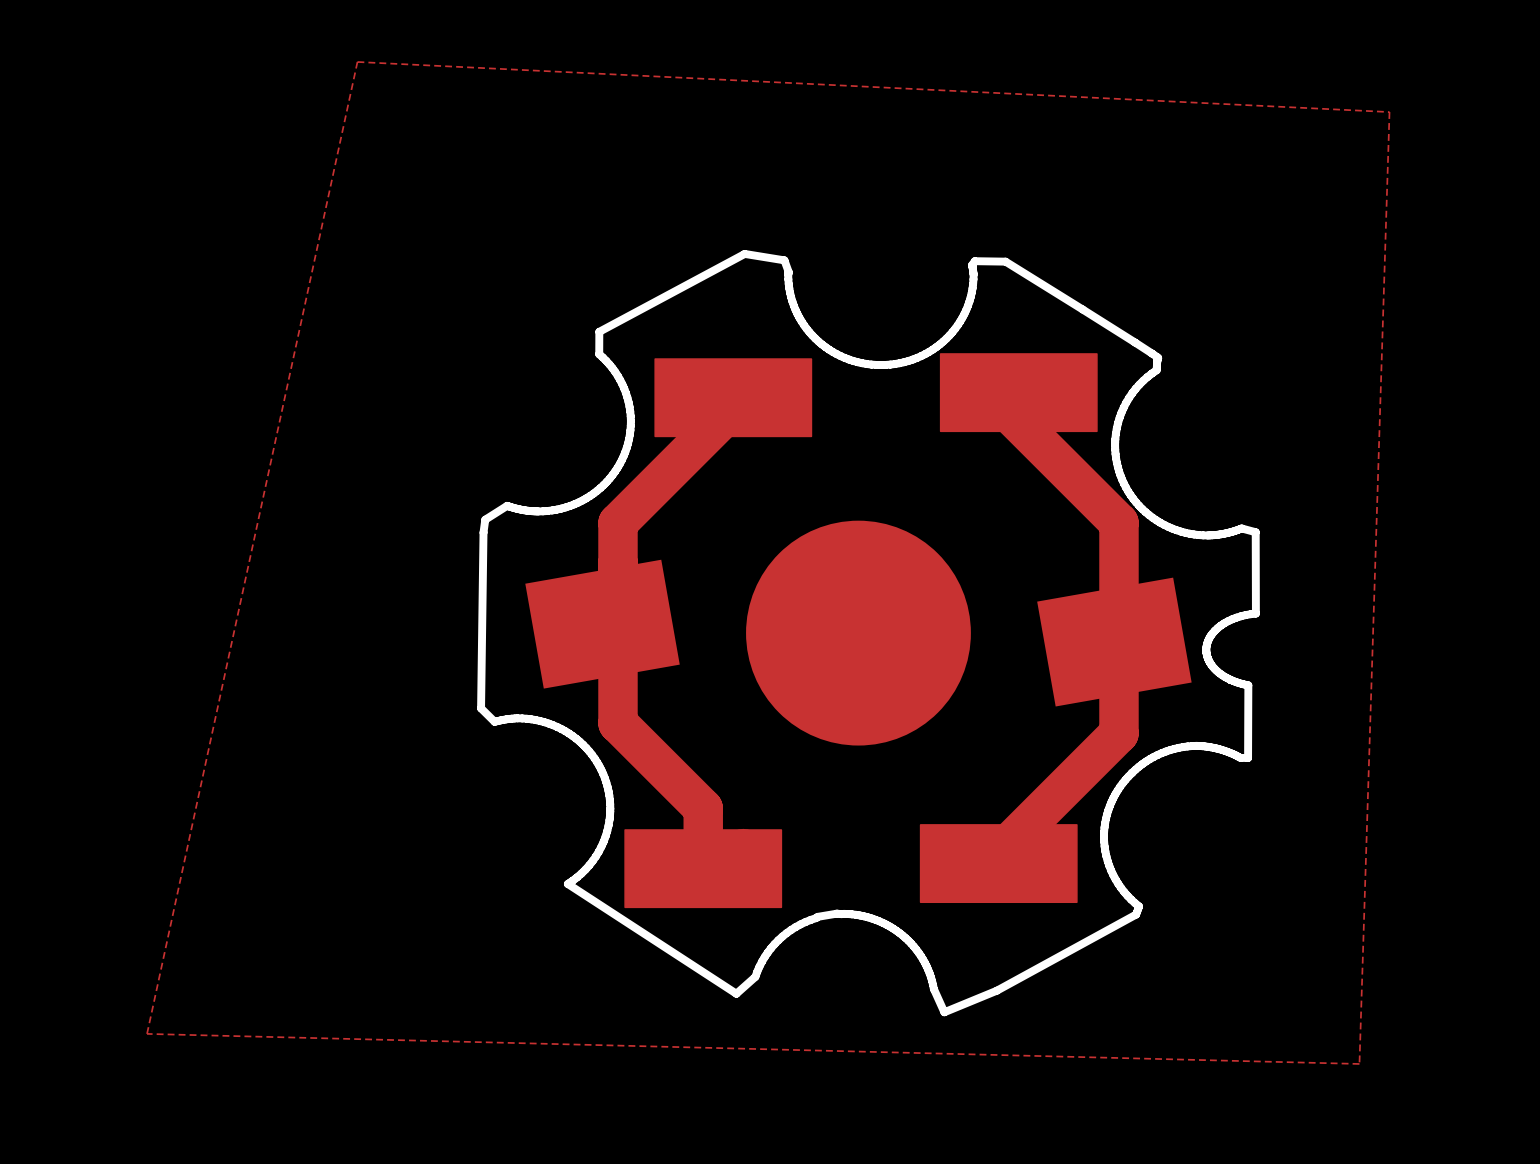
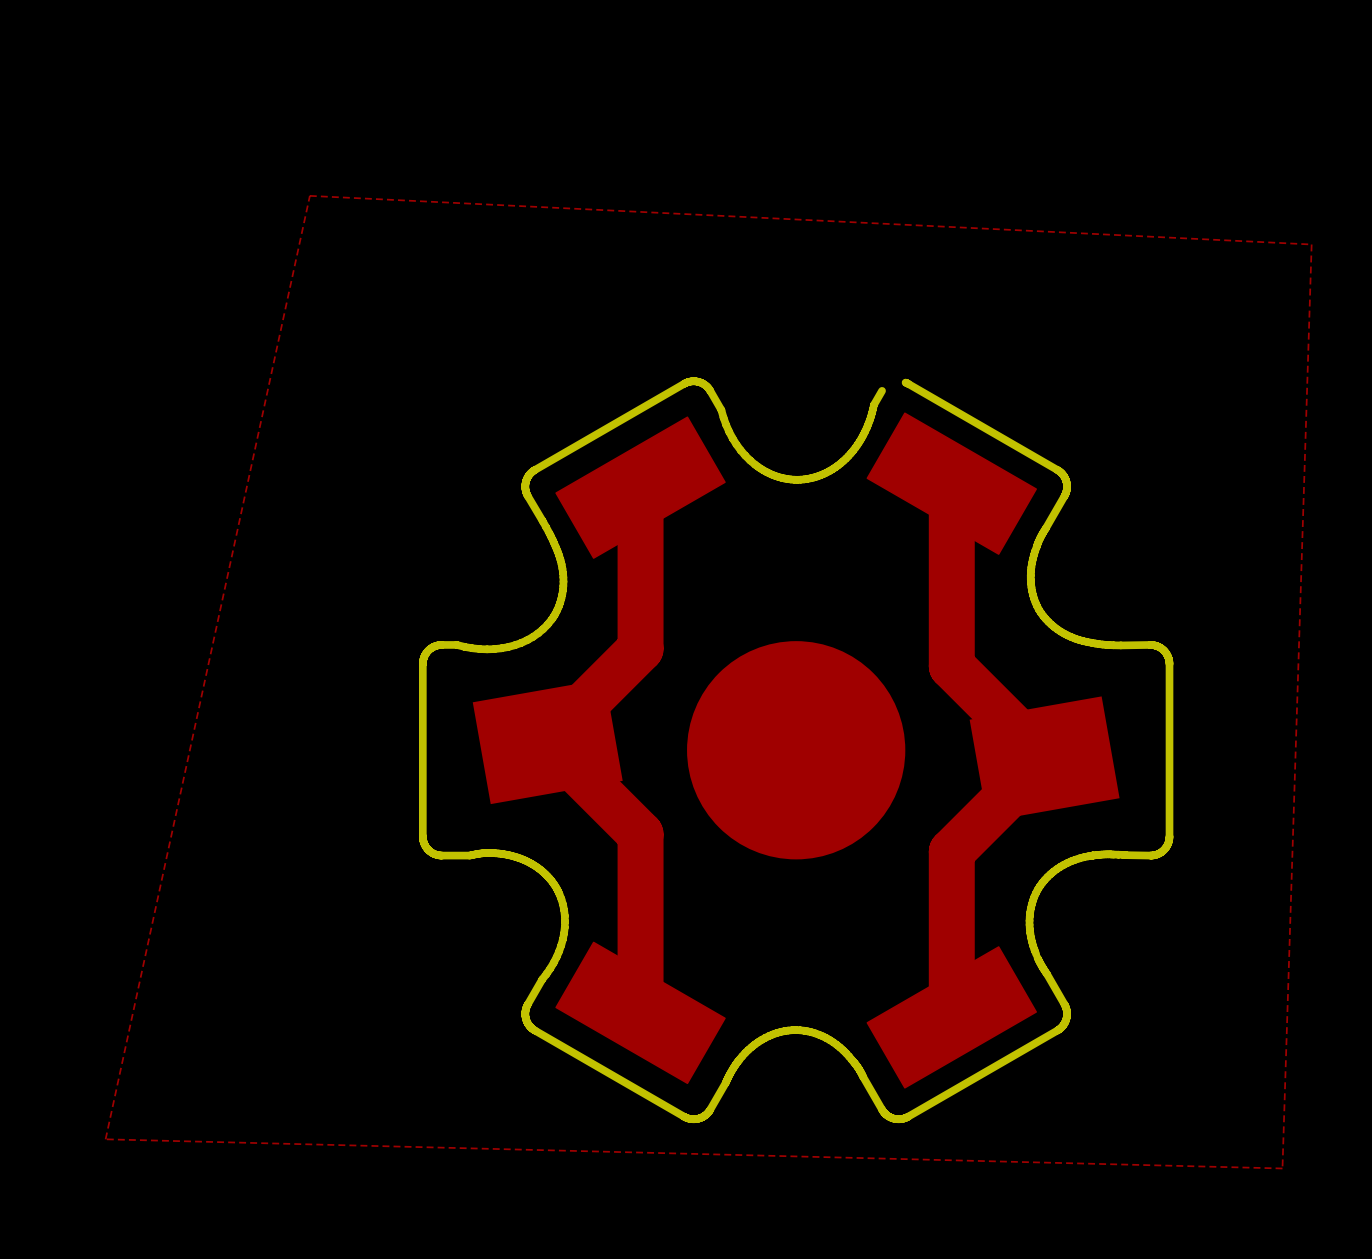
board edge: none -> (908, 383) (1057, 470) (1064, 476) (1066, 484) (1066, 492) (1039, 539) (1031, 567) (1031, 583) (1034, 598) (1038, 609) (1048, 621) (1064, 633) (1079, 639) (1106, 644) (1154, 645) (1161, 648) (1167, 655) (1169, 664) (1169, 840) (1165, 848) (1156, 854) (1126, 855)
board edge: none -> (882, 390) (873, 404) (865, 431) (853, 450) (832, 469) (810, 478) (797, 479) (781, 477) (755, 464) (740, 450) (732, 438) (721, 410) (709, 389) (702, 383) (694, 381) (684, 383) (534, 470) (526, 479) (525, 491) (552, 540) (562, 568) (562, 594) (555, 614) (538, 633) (514, 645) (487, 649) (456, 644) (439, 645) (429, 649) (423, 660) (422, 836) (425, 845) (431, 852) (439, 855) (495, 853) (524, 860) (538, 868) (549, 878) (558, 891) (562, 904) (565, 921) (561, 945) (553, 962) (526, 1007) (525, 1016) (529, 1025) (690, 1118) (700, 1118) (708, 1112) (739, 1060)
board edge: (788, 271) (784, 260) (744, 253) (599, 331) (599, 354) (617, 376) (628, 402) (630, 425) (626, 447) (619, 464) (609, 478) (597, 490) (582, 500) (561, 508) (542, 511) (524, 510) (507, 505) (485, 519) (481, 708) (494, 721) (511, 718) (526, 718) (544, 722) (561, 728) (583, 744) (601, 770) (609, 799) (607, 831) (601, 846) (592, 860) (581, 873) (567, 884) (736, 993) (755, 976) (767, 952) (786, 933) (817, 916) (841, 914) -> none
board edge: (788, 274) (792, 301) (806, 328) (829, 349) (857, 362) (880, 365) (904, 362) (925, 354) (943, 341) (957, 325) (967, 305) (973, 283) (972, 265) (974, 261) (1005, 261) (1158, 358) -> none
top track: none -> (951, 483) (951, 666) (1044, 758) (951, 851) (951, 1017)
board edge: (1157, 361) (1156, 370) (1135, 388) (1121, 412) (1115, 439) (1116, 462) (1123, 483) (1133, 498) (1145, 512) (1164, 524) (1180, 531) (1198, 535) (1220, 534) (1241, 528) (1255, 532) (1255, 613) (1240, 616) (1224, 623) (1212, 633) (1206, 646) (1206, 655) (1211, 664) (1220, 673) (1230, 679) -> none
top track: none -> (640, 487) (640, 648) (547, 741) (640, 834) (640, 1012)
part: none -> (640, 487)
top track: (753, 387) (617, 523) (617, 723) (703, 808) (703, 868) -> none
top track: (983, 387) (1118, 522) (1118, 733) (998, 853) (998, 863) -> none
part rotation: 0° (1018, 392) -> 30° clockwise (951, 483)
part: (733, 397) -> none
board edge: (1231, 680) (1248, 685) (1248, 757) (1240, 757) (1211, 747) (1187, 746) (1157, 754) (1132, 772) -> none
board edge: none -> (1092, 855) (1075, 859) (1060, 866) (1047, 877) (1037, 889) (1031, 904) (1029, 920) (1031, 937) (1036, 954)
board edge: none -> (1125, 855) (1093, 855)
board edge: (1131, 773) (1120, 786) (1111, 802) (1106, 818) (1103, 836) (1105, 851) (1111, 870) (1124, 892) (1139, 906) (1136, 914) (997, 990) (944, 1012) (926, 966) (908, 940) (893, 928) (879, 921) (860, 915) (843, 913) -> none
board edge: none -> (1037, 957) (1065, 1007) (1066, 1017) (1062, 1026) (904, 1118) (894, 1118) (885, 1114) (858, 1068) (849, 1056) (833, 1042) (815, 1033) (796, 1030) (776, 1033) (754, 1044) (739, 1059)
part: (998, 863) -> none
part rotation: 0° (703, 868) -> 30° clockwise (640, 1012)
part: none -> (951, 1017)

